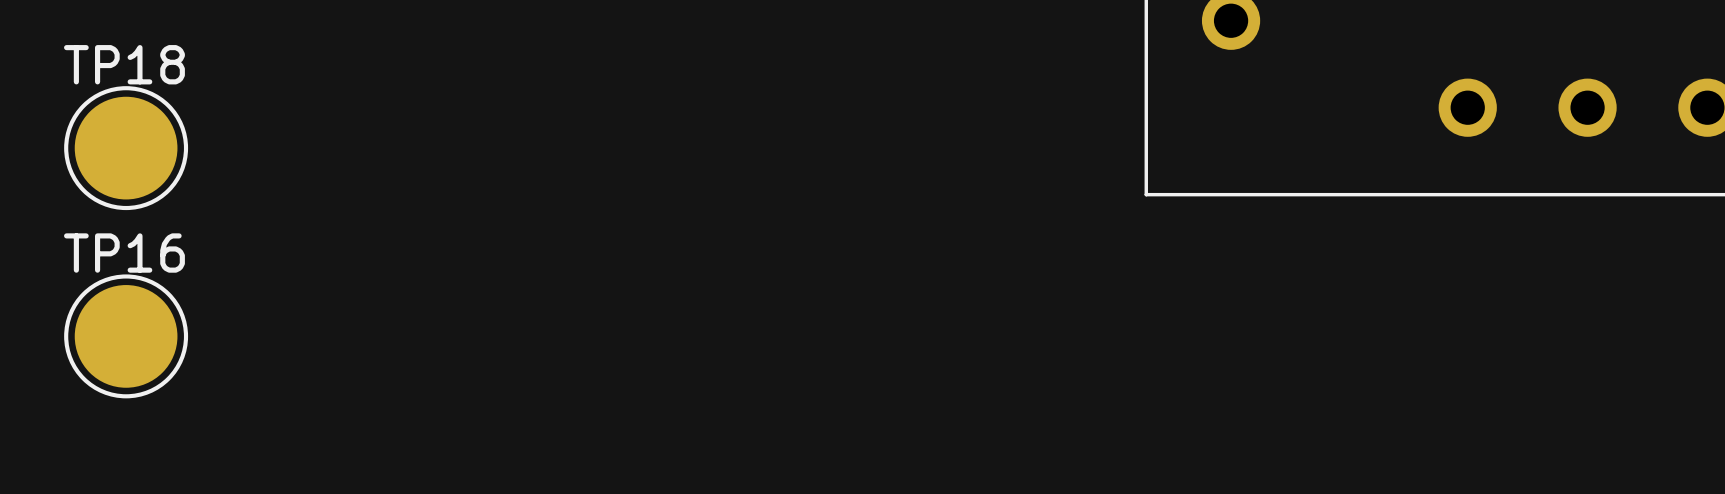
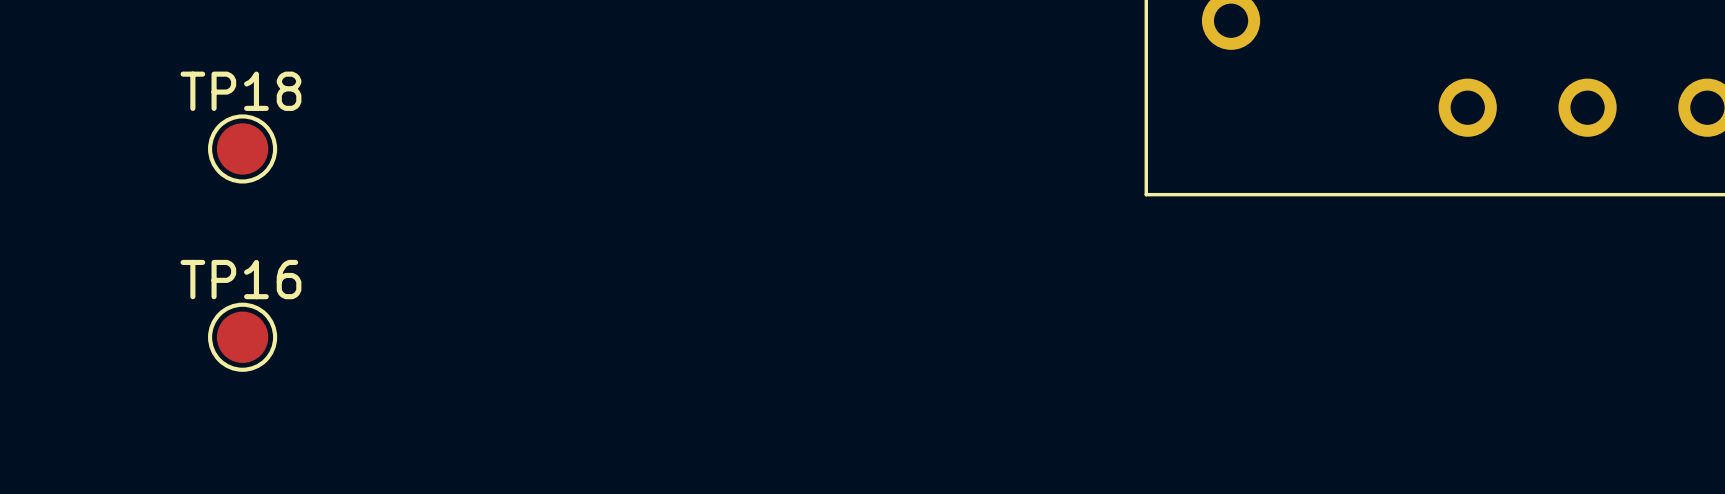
TP18 footprint: [64, 86, 189, 211] -> [208, 114, 278, 184]
TP16 footprint: [64, 274, 189, 399] -> [208, 302, 278, 372]

